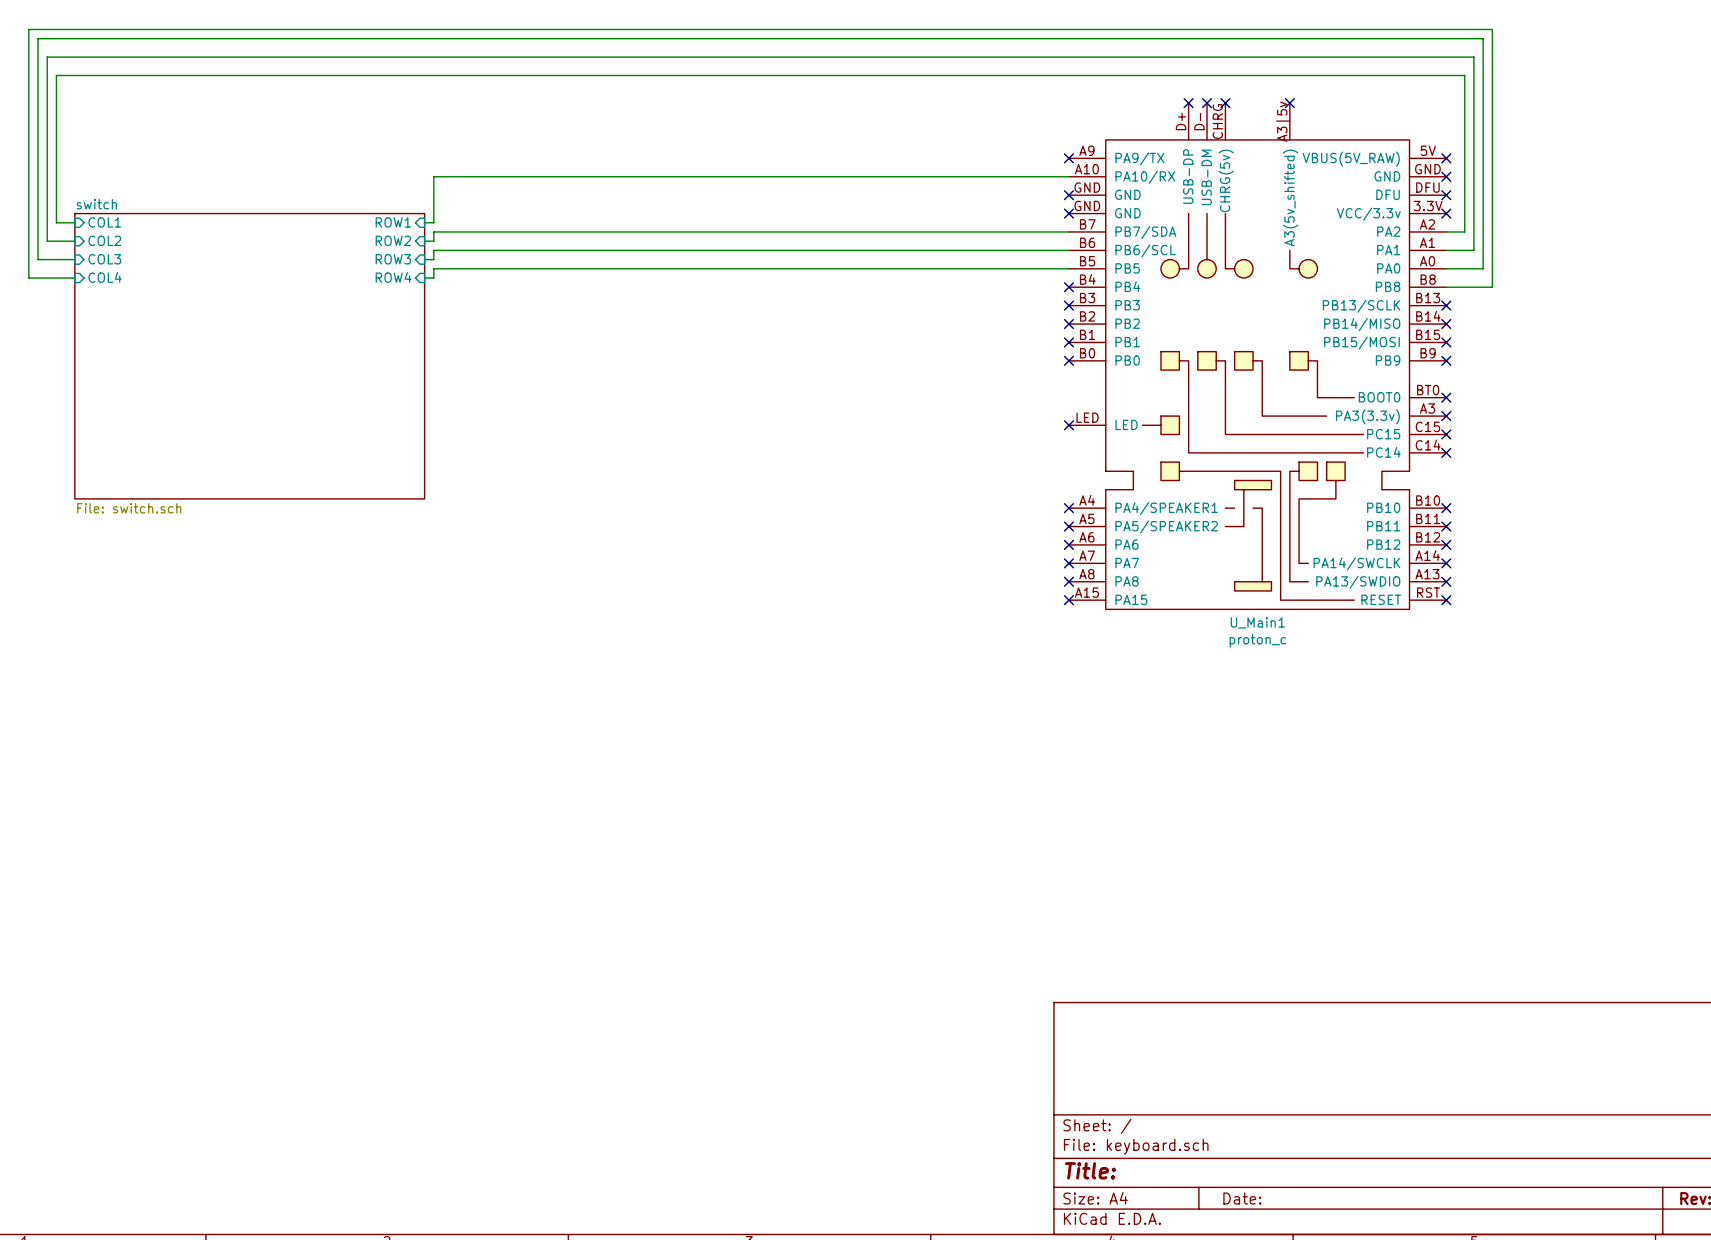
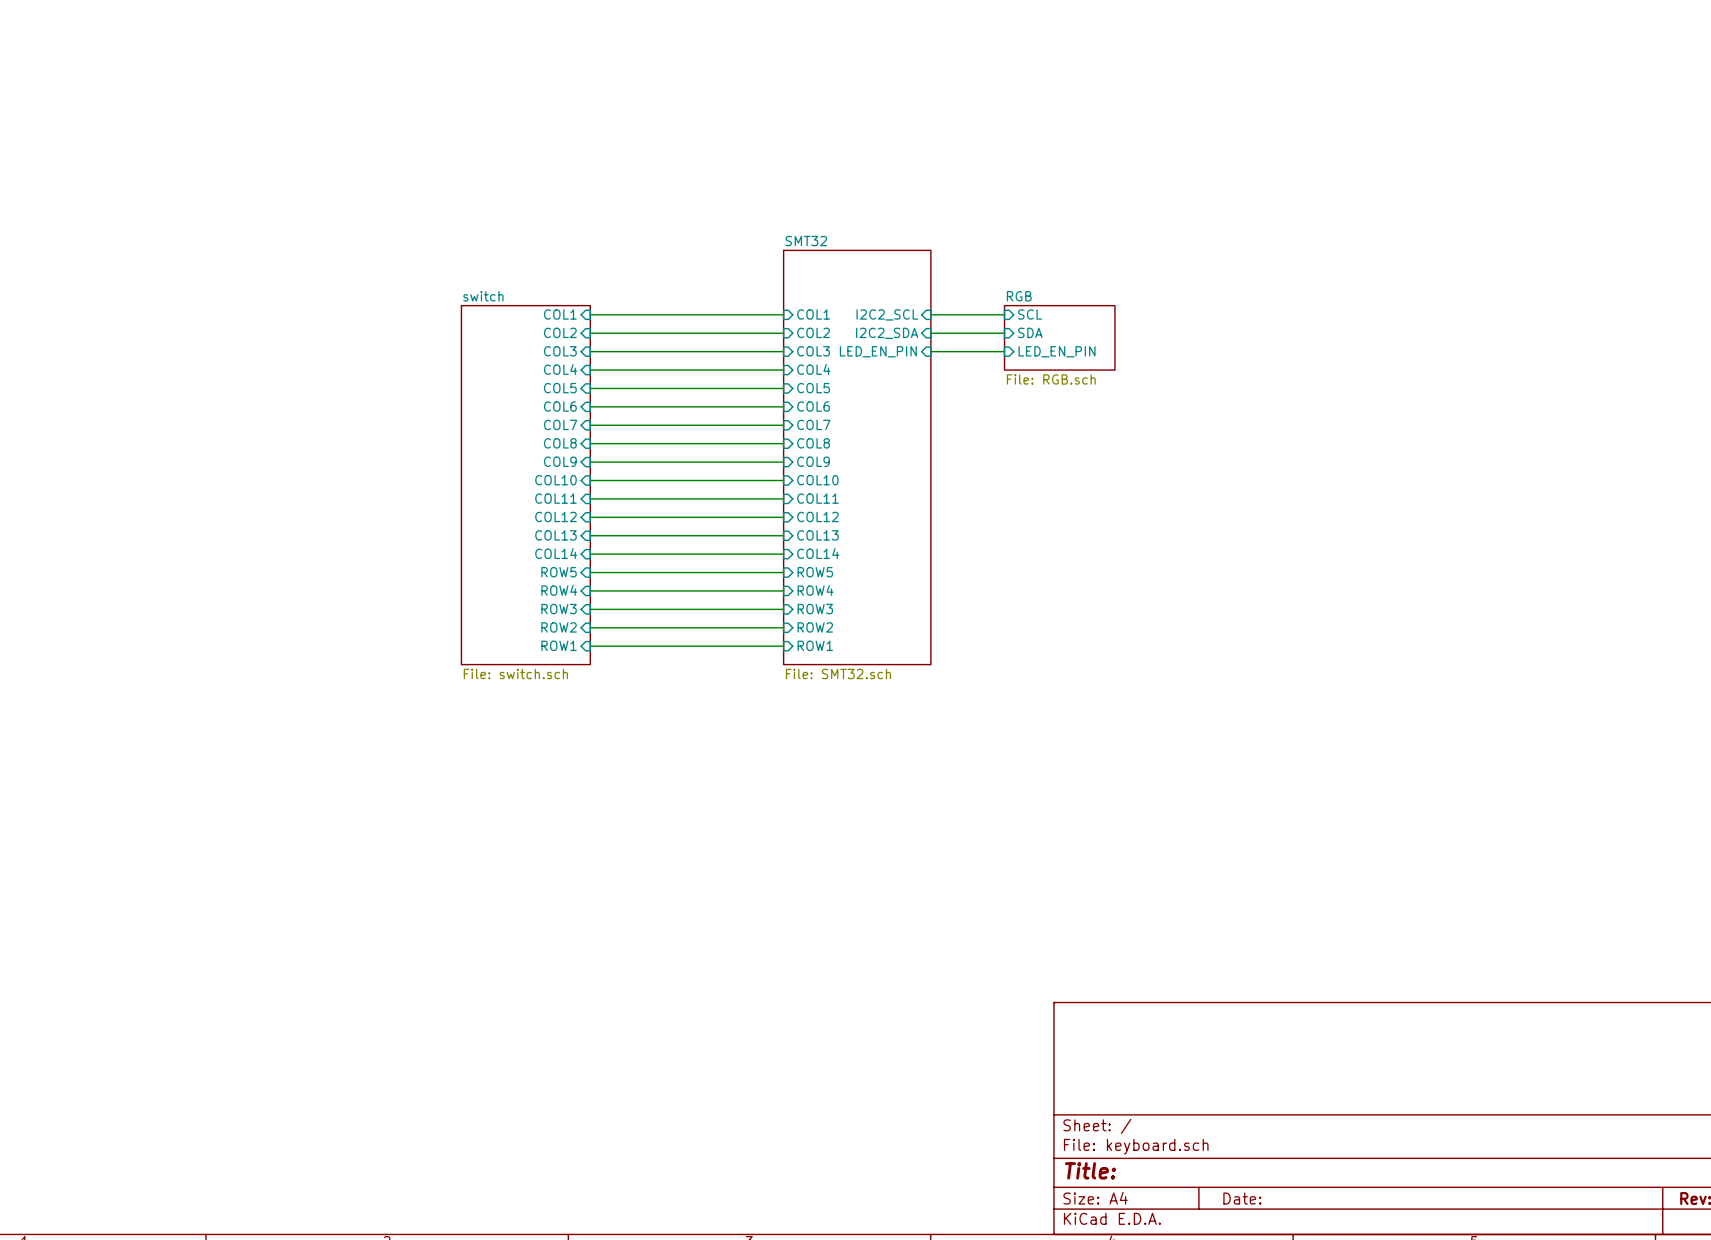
no-connect mark: (1188, 103) -> none
no-connect mark: (1207, 103) -> none
no-connect mark: (1225, 103) -> none
no-connect mark: (1289, 103) -> none
no-connect mark: (1068, 158) -> none
no-connect mark: (1446, 158) -> none
wire: (1068, 176) (433, 176) (433, 222) (424, 222) -> none
no-connect mark: (1446, 176) -> none
no-connect mark: (1068, 195) -> none
no-connect mark: (1446, 195) -> none
no-connect mark: (1068, 213) -> none
no-connect mark: (1446, 213) -> none
wire: (74, 222) (56, 222) (56, 75) (1464, 75) (1464, 231) (1446, 231) -> none
sheet pin: COL1 (104, 222) -> none
sheet pin: ROW1 (393, 222) -> none
wire: (1068, 231) (433, 231) (433, 241) (424, 241) -> none
sheet pin: COL2 (104, 240) -> none
sheet pin: ROW2 (393, 240) -> none
wire: (74, 241) (47, 241) (47, 57) (1473, 57) (1473, 250) (1446, 250) -> none
wire: (1068, 250) (433, 250) (433, 259) (424, 259) -> none
wire: (74, 259) (38, 259) (38, 38) (1483, 38) (1483, 268) (1446, 268) -> none
sheet pin: COL3 (104, 259) -> none
sheet pin: ROW3 (393, 259) -> none
wire: (1068, 268) (433, 268) (433, 278) (424, 278) -> none
sheet pin: COL4 (105, 277) -> none
sheet pin: ROW4 (393, 277) -> none
wire: (74, 278) (28, 278) (28, 29) (1492, 29) (1492, 287) (1446, 287) -> none
no-connect mark: (1068, 287) -> none
no-connect mark: (1068, 305) -> none
no-connect mark: (1446, 305) -> none
sheet pin: none -> COL1 (560, 314)
wire: none -> (590, 314) (783, 314)
sheet pin: none -> COL1 (813, 314)
sheet pin: none -> I2C2_SCL (887, 314)
wire: none -> (930, 314) (1004, 314)
sheet pin: none -> SCL (1030, 314)
no-connect mark: (1068, 324) -> none
no-connect mark: (1446, 324) -> none
sheet pin: none -> COL2 (560, 332)
sheet pin: none -> COL2 (813, 332)
sheet pin: none -> SDA (1030, 332)
wire: none -> (590, 333) (783, 333)
sheet pin: none -> I2C2_SDA (887, 333)
wire: none -> (930, 333) (1004, 333)
sheet RGB: none -> File: RGB.sch (1059, 337)
no-connect mark: (1068, 342) -> none
no-connect mark: (1446, 342) -> none
sheet pin: none -> COL3 (560, 351)
wire: none -> (590, 351) (783, 351)
sheet pin: none -> COL3 (813, 351)
sheet pin: none -> LED_EN_PIN (878, 351)
wire: none -> (930, 351) (1004, 351)
sheet pin: none -> LED_EN_PIN (1057, 351)
sheet switch: File: switch.sch (249, 356) -> none
U_Main1: proton_c (1257, 356) -> none
no-connect mark: (1068, 360) -> none
no-connect mark: (1446, 360) -> none
sheet pin: none -> COL4 (560, 369)
sheet pin: none -> COL4 (813, 369)
wire: none -> (590, 370) (783, 370)
sheet pin: none -> COL5 (560, 388)
wire: none -> (590, 388) (783, 388)
sheet pin: none -> COL5 (813, 388)
no-connect mark: (1446, 397) -> none
sheet pin: none -> COL6 (560, 406)
wire: none -> (590, 406) (783, 406)
sheet pin: none -> COL6 (813, 406)
no-connect mark: (1446, 416) -> none
sheet pin: none -> COL7 (560, 424)
sheet pin: none -> COL7 (813, 424)
wire: none -> (590, 425) (783, 425)
no-connect mark: (1068, 425) -> none
no-connect mark: (1446, 434) -> none
sheet pin: none -> COL8 (560, 443)
wire: none -> (590, 443) (783, 443)
sheet pin: none -> COL8 (813, 443)
no-connect mark: (1446, 452) -> none
sheet SMT32: none -> File: SMT32.sch (857, 457)
sheet pin: none -> COL9 (560, 461)
sheet pin: none -> COL9 (813, 461)
wire: none -> (590, 462) (783, 462)
sheet pin: none -> COL10 (555, 480)
wire: none -> (590, 480) (783, 480)
sheet pin: none -> COL10 (817, 480)
sheet switch: none -> File: switch.sch (525, 485)
sheet pin: none -> COL11 (555, 498)
wire: none -> (590, 498) (783, 498)
sheet pin: none -> COL11 (817, 498)
no-connect mark: (1068, 508) -> none
no-connect mark: (1446, 508) -> none
sheet pin: none -> COL12 (555, 516)
sheet pin: none -> COL12 (817, 516)
wire: none -> (590, 517) (783, 517)
no-connect mark: (1068, 526) -> none
no-connect mark: (1446, 526) -> none
sheet pin: none -> COL13 (555, 535)
wire: none -> (590, 535) (783, 535)
sheet pin: none -> COL13 (817, 535)
no-connect mark: (1068, 544) -> none
no-connect mark: (1446, 544) -> none
sheet pin: none -> COL14 (556, 553)
sheet pin: none -> COL14 (818, 553)
wire: none -> (590, 554) (783, 554)
no-connect mark: (1068, 563) -> none
no-connect mark: (1446, 563) -> none
sheet pin: none -> ROW5 (559, 572)
wire: none -> (590, 572) (783, 572)
sheet pin: none -> ROW5 (815, 572)
no-connect mark: (1068, 581) -> none
no-connect mark: (1446, 581) -> none
sheet pin: none -> ROW4 (559, 590)
wire: none -> (590, 590) (783, 590)
sheet pin: none -> ROW4 (815, 590)
no-connect mark: (1068, 600) -> none
no-connect mark: (1446, 600) -> none
sheet pin: none -> ROW3 (559, 609)
wire: none -> (590, 609) (783, 609)
sheet pin: none -> ROW3 (815, 609)
sheet pin: none -> ROW2 (559, 627)
wire: none -> (590, 627) (783, 627)
sheet pin: none -> ROW2 (815, 627)
sheet pin: none -> ROW1 (559, 645)
sheet pin: none -> ROW1 (815, 645)
wire: none -> (590, 646) (783, 646)

